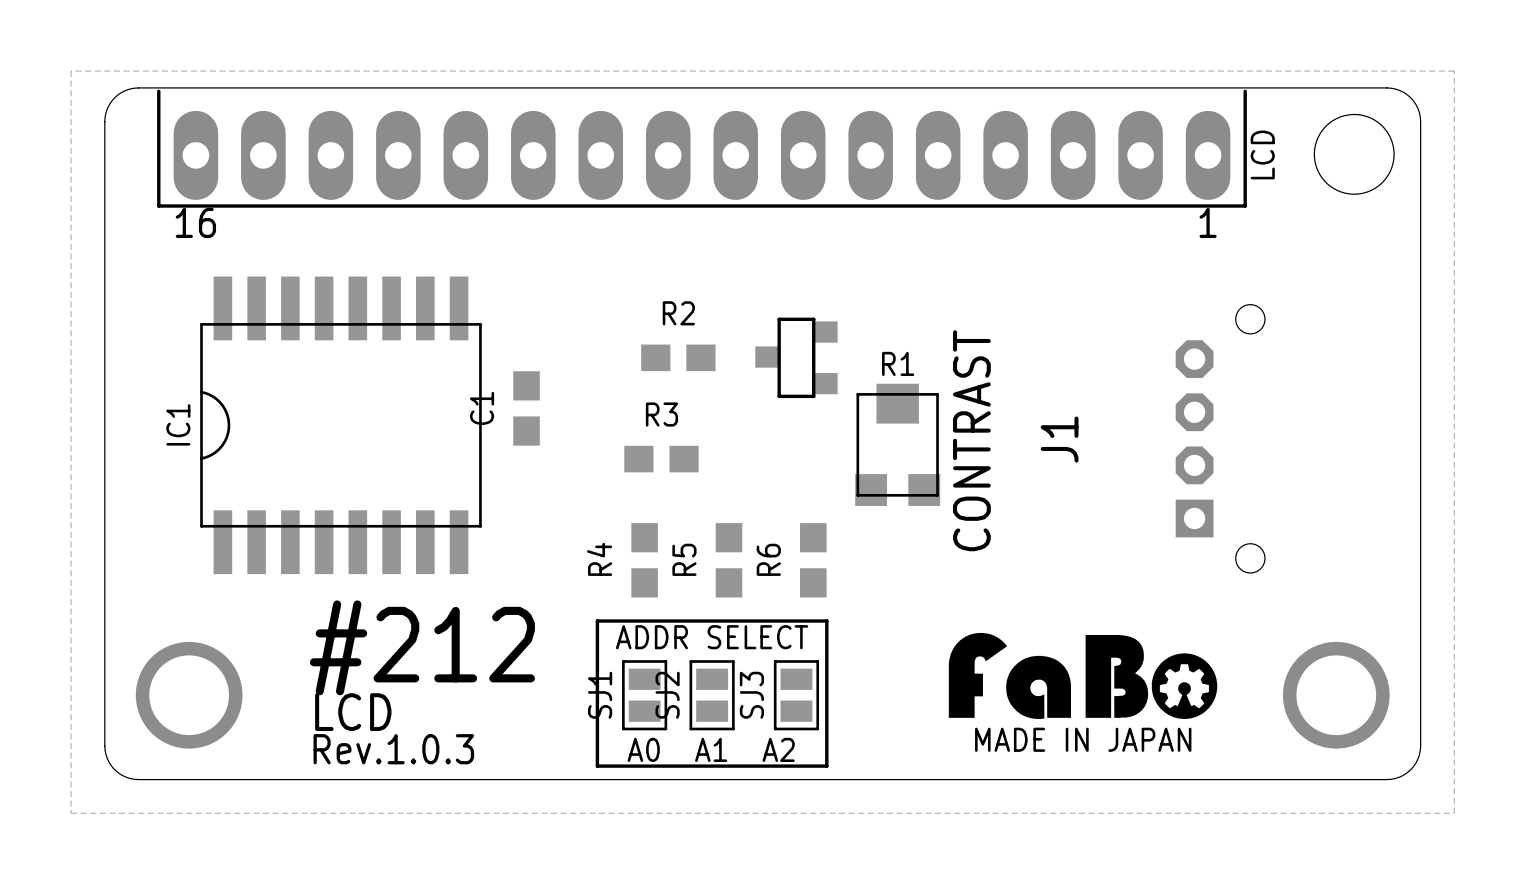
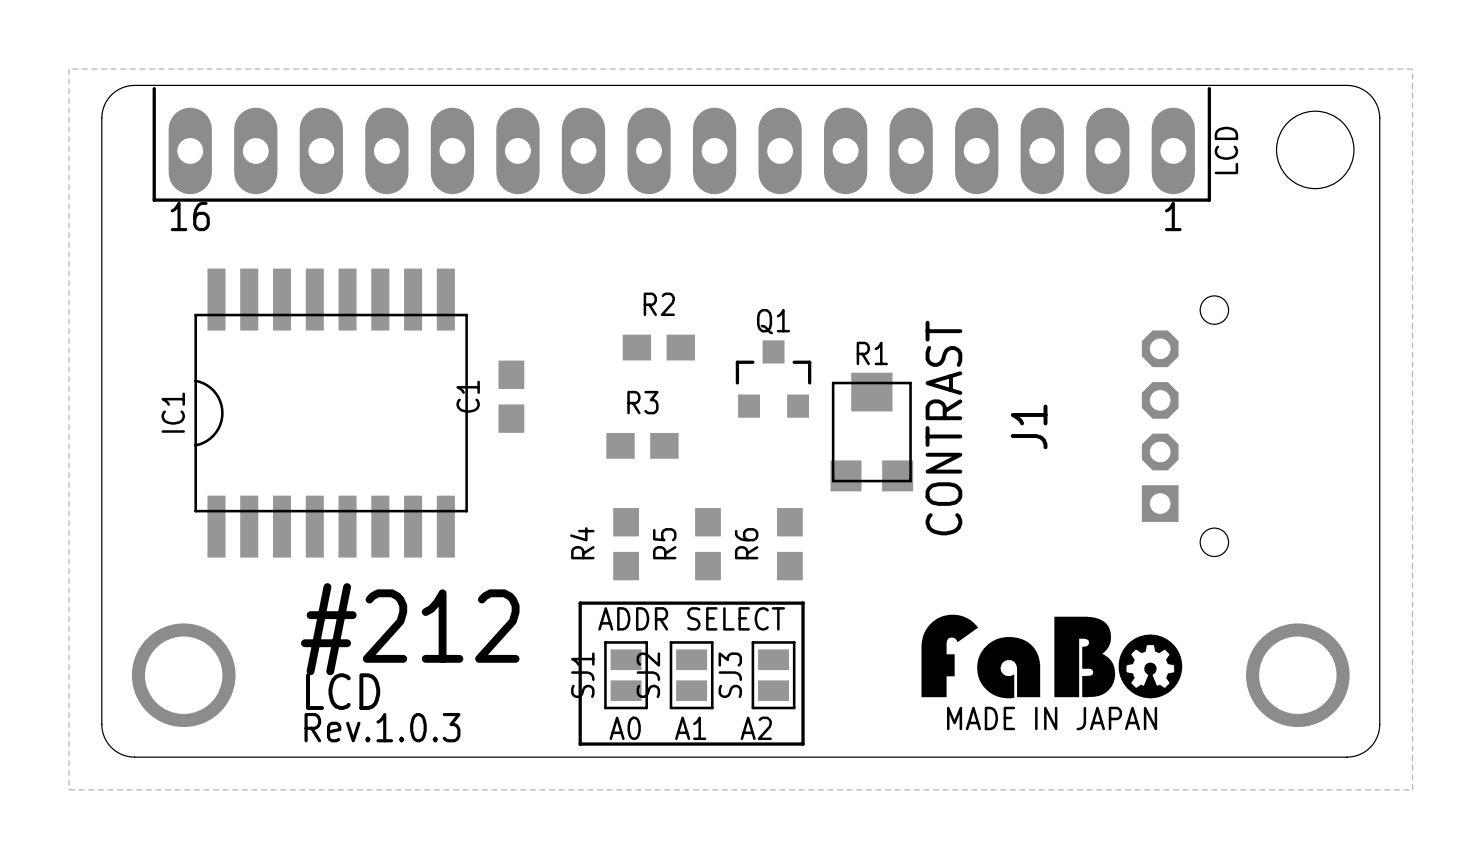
part: (796, 357) -> none
Q1: none -> (773, 379)

